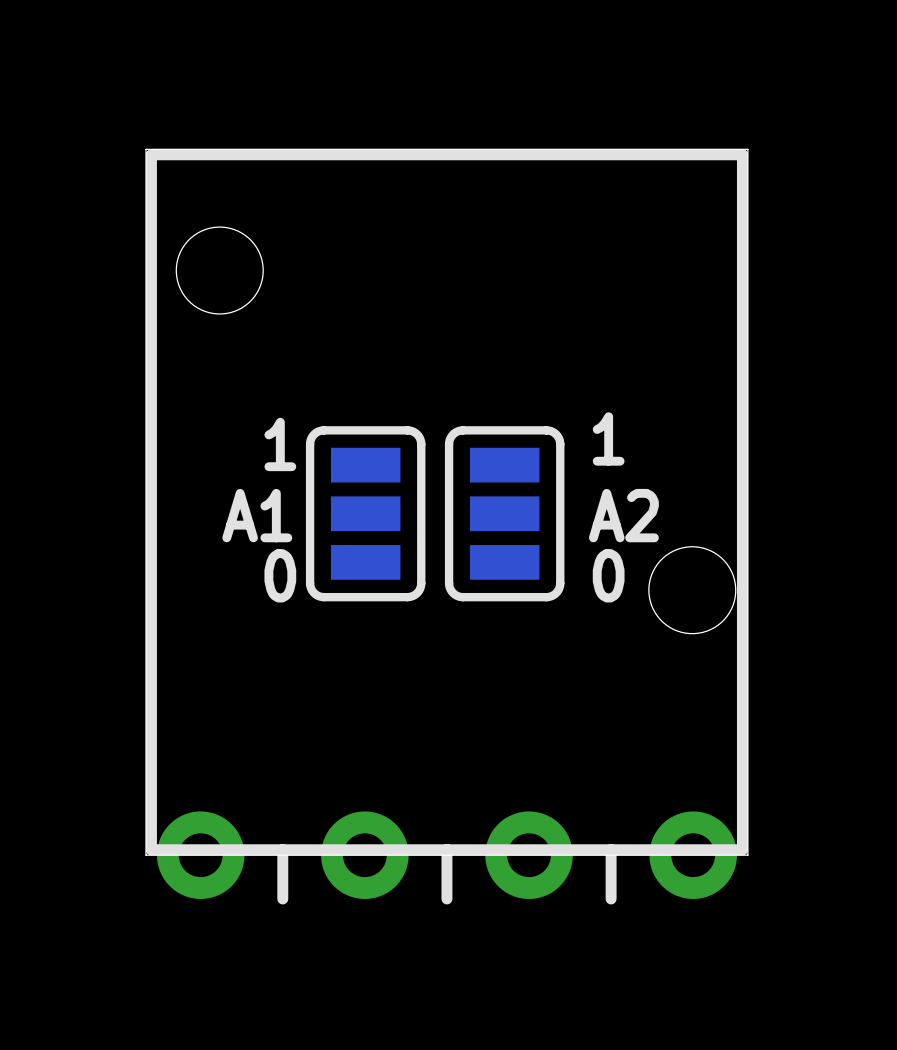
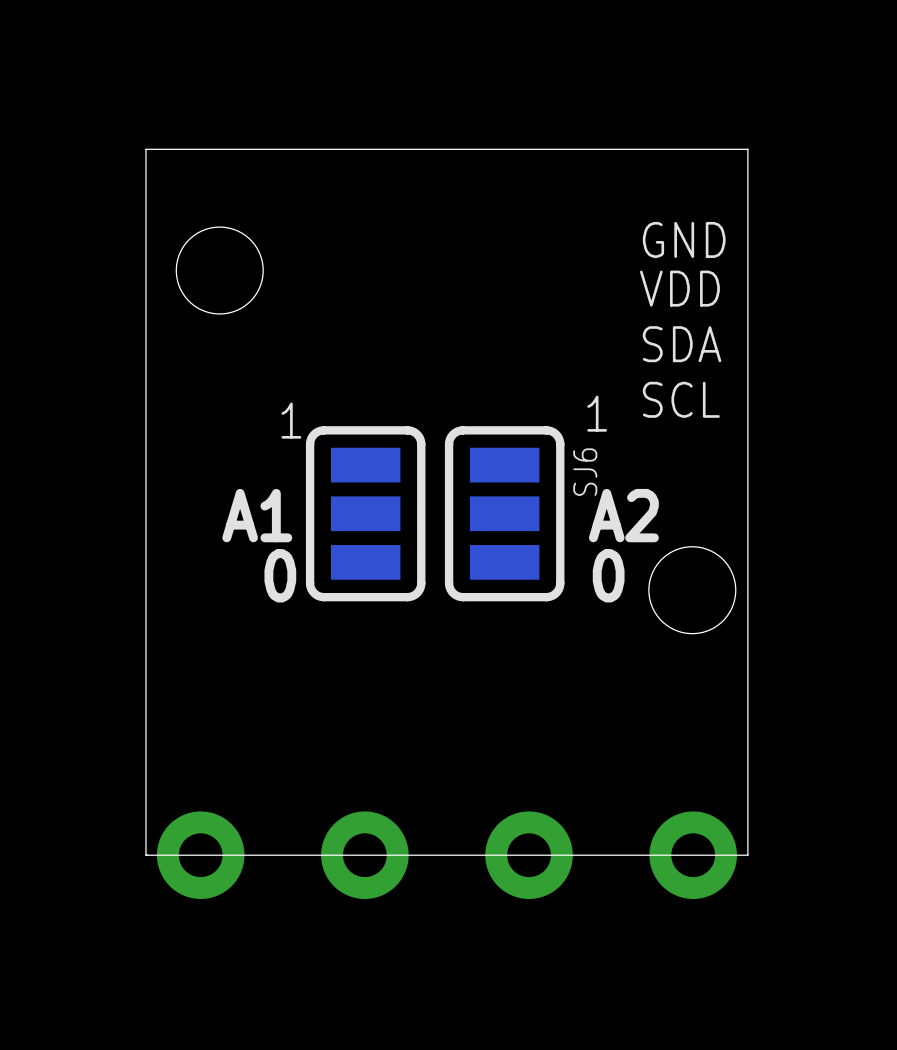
line: (742, 154) (742, 849) (151, 849) (151, 154) (742, 154) -> none
text: none -> GND (684, 239)
text: none -> VDD (679, 288)
text: none -> SDA (682, 344)
text: none -> SCL (681, 399)
text position: 1 (608, 438) -> 1 (597, 413)
text position: 1 (280, 444) -> 1 (291, 420)
SJ6 name: none -> SJ6 (585, 472)
line: (282, 849) (282, 898) -> none
line: (446, 849) (446, 898) -> none
line: (611, 849) (611, 898) -> none

